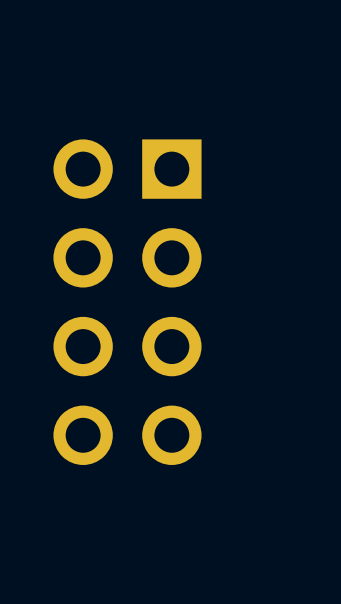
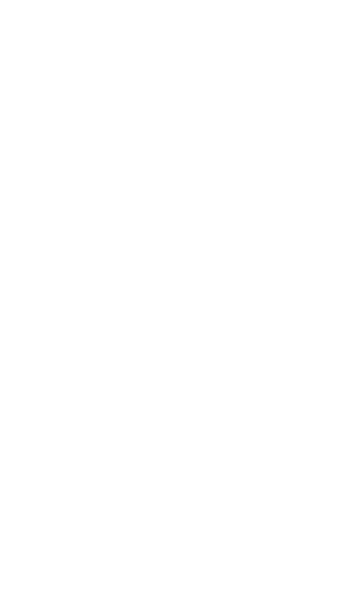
part: (127, 302) -> none

